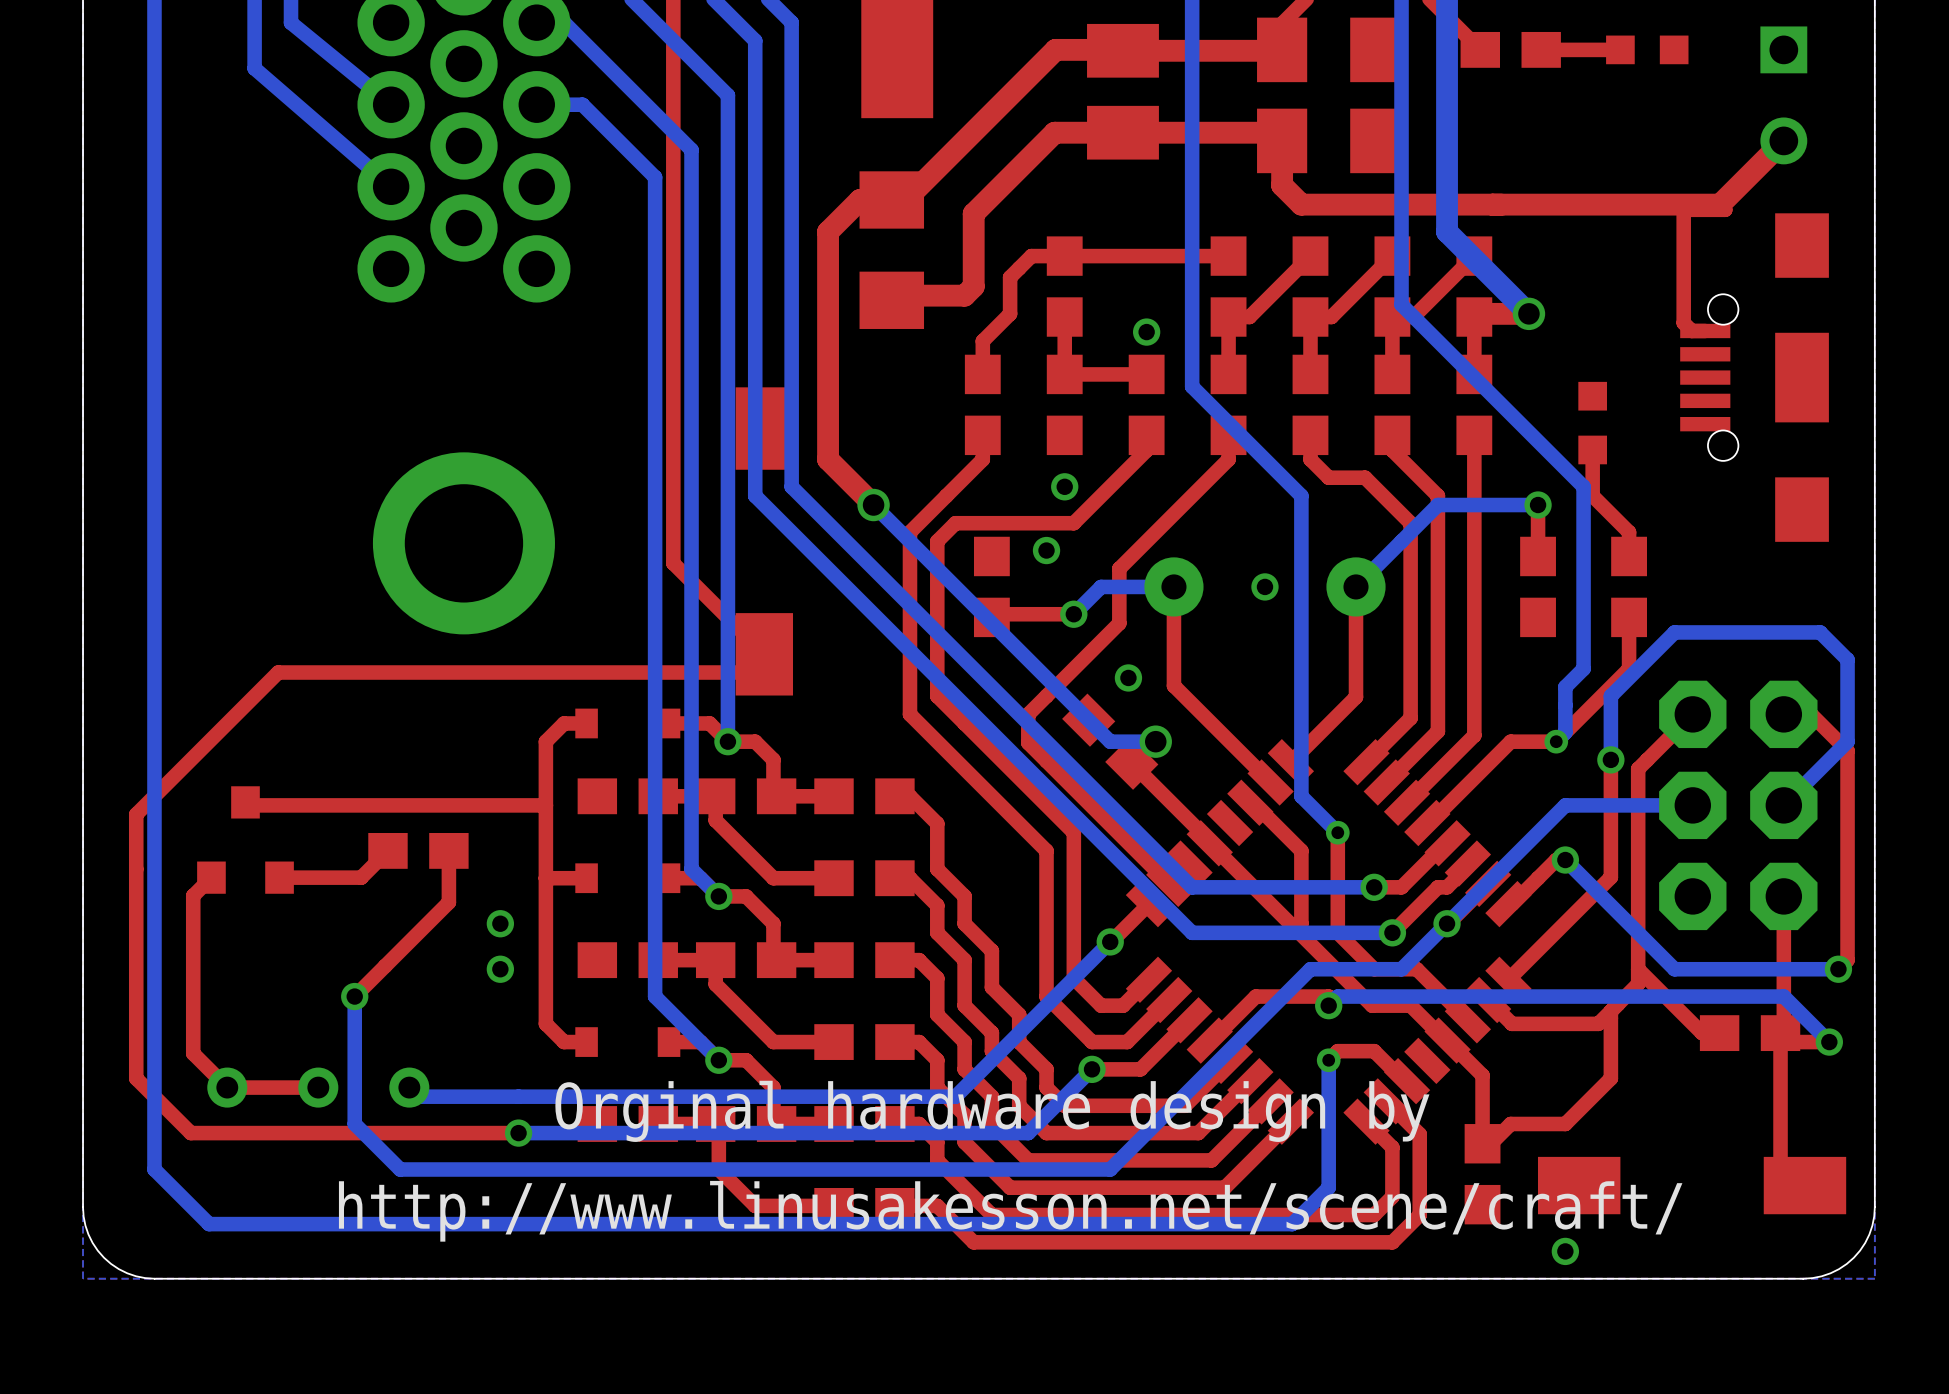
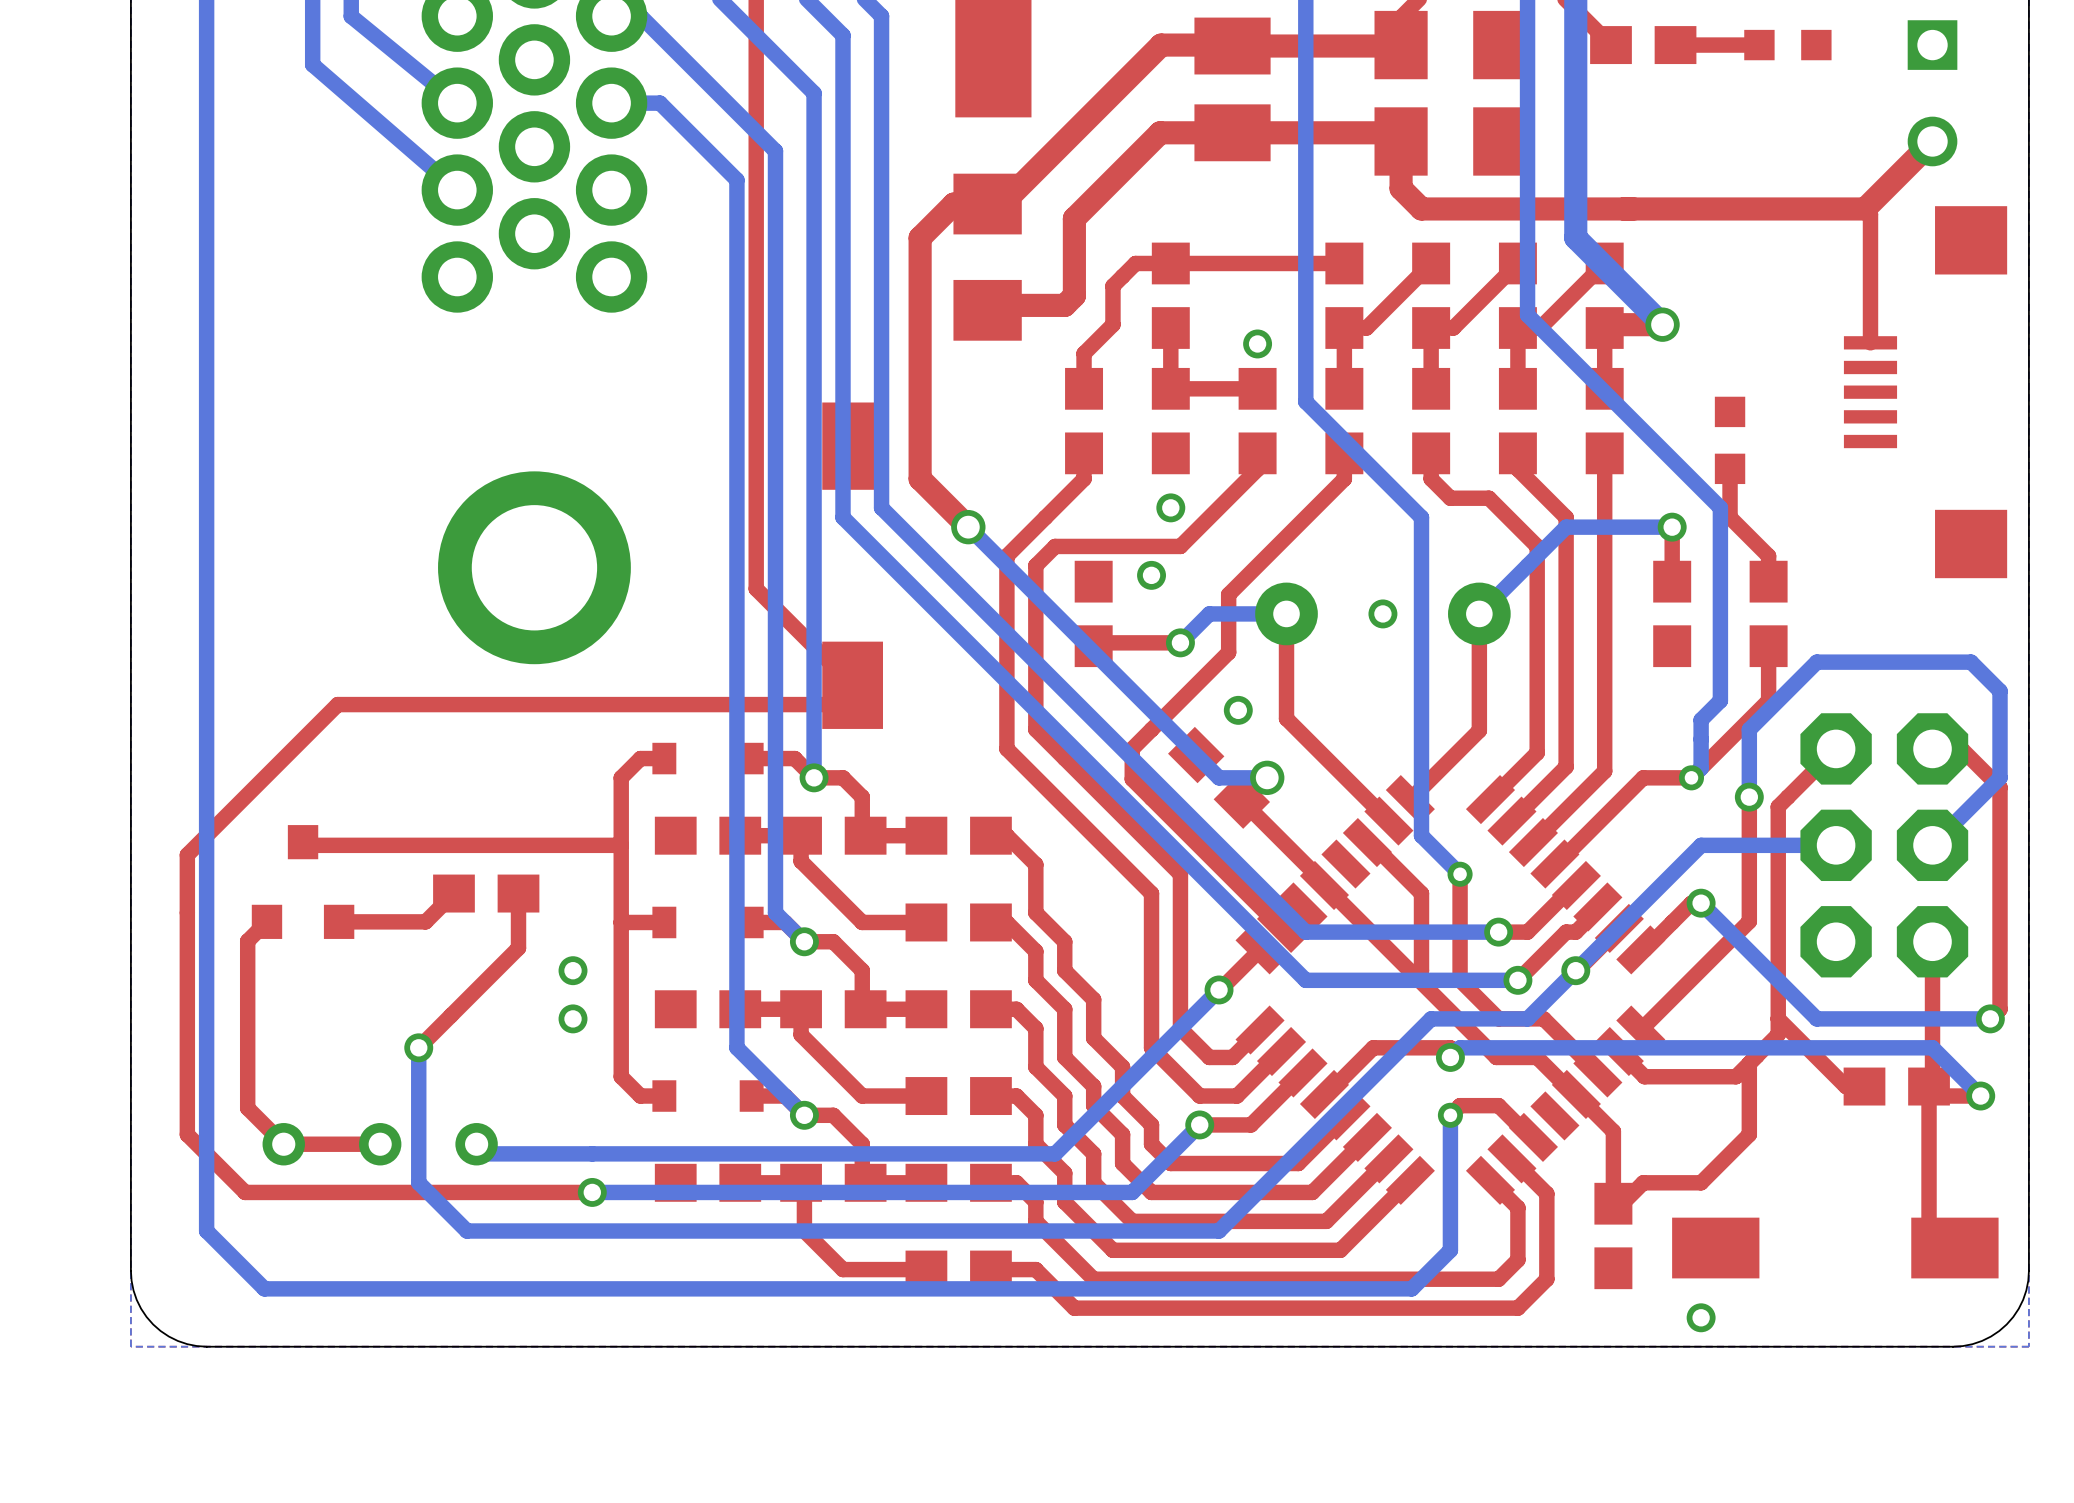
top track: (1725, 209) (1683, 209) (1683, 322) (1691, 330) (1705, 330) -> (1870, 214) (1870, 342)
part footprint: [1680, 213, 1829, 542] -> [1843, 206, 2008, 579]
text: Orginal hardware design by (992, 1111) -> none
text: http://www.linusakesson.net/scene/craft/ (1010, 1211) -> none

